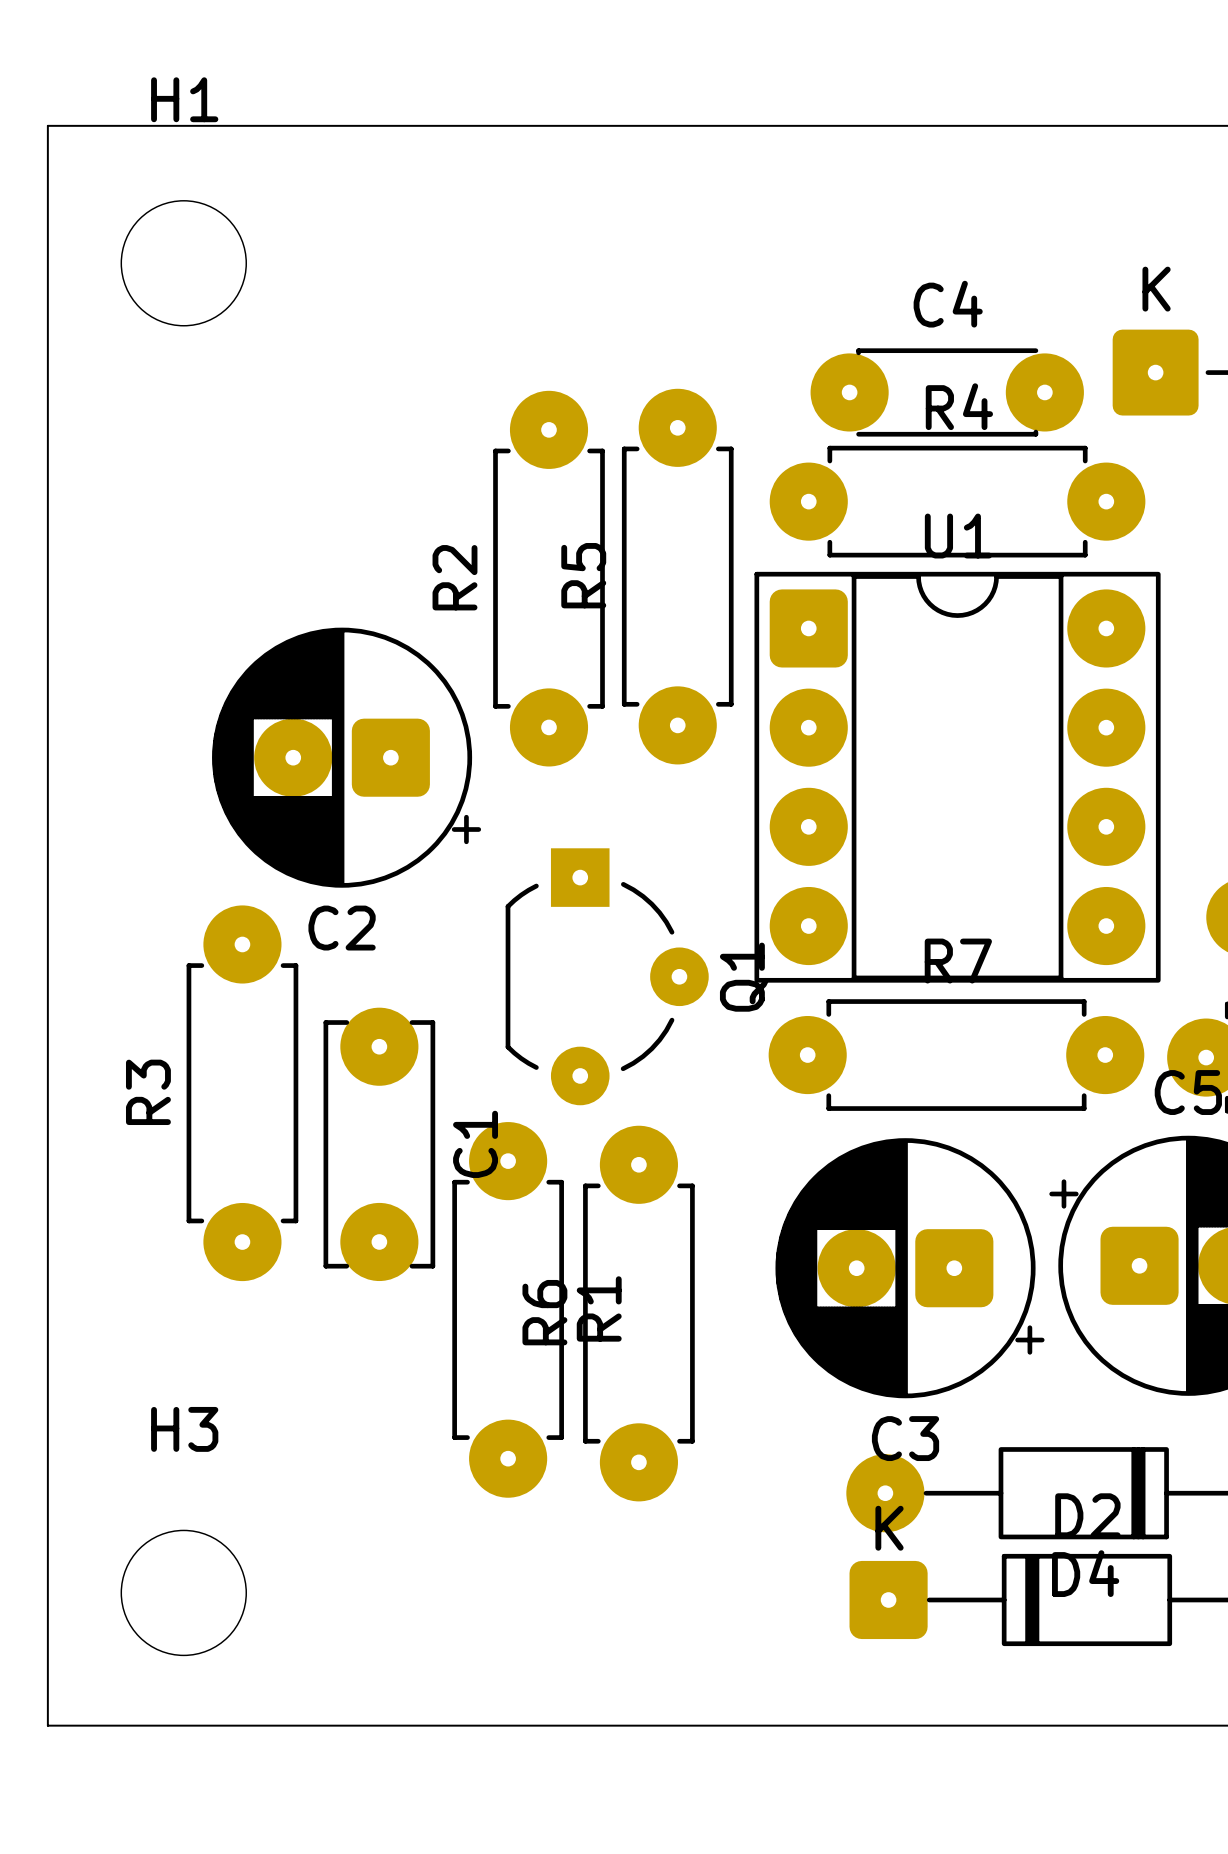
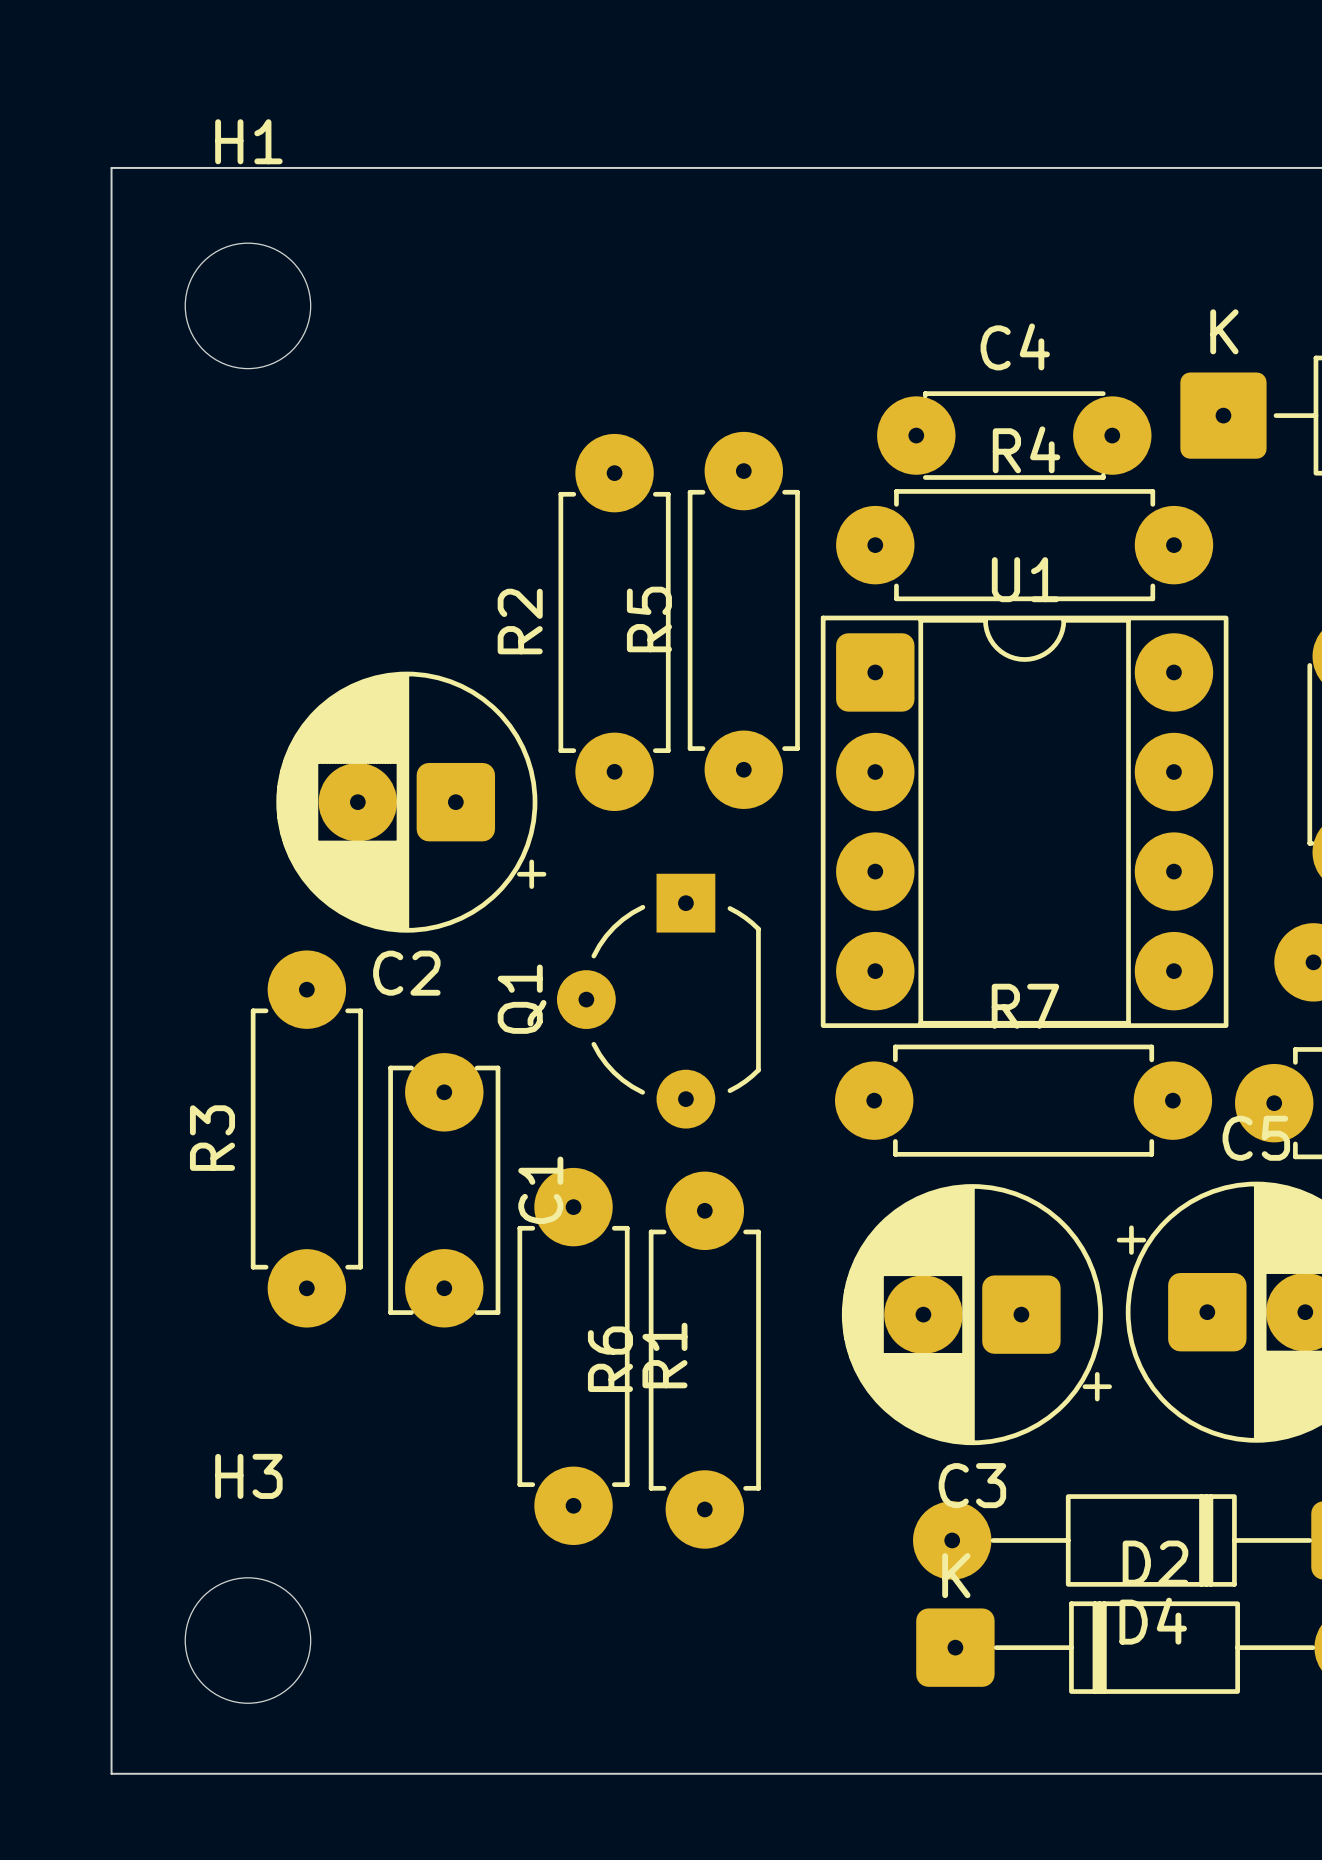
Q1 footprint: [505, 848, 709, 1106] -> [556, 873, 761, 1129]
Q1 name position: Q1 (744, 977) -> Q1 (522, 999)

